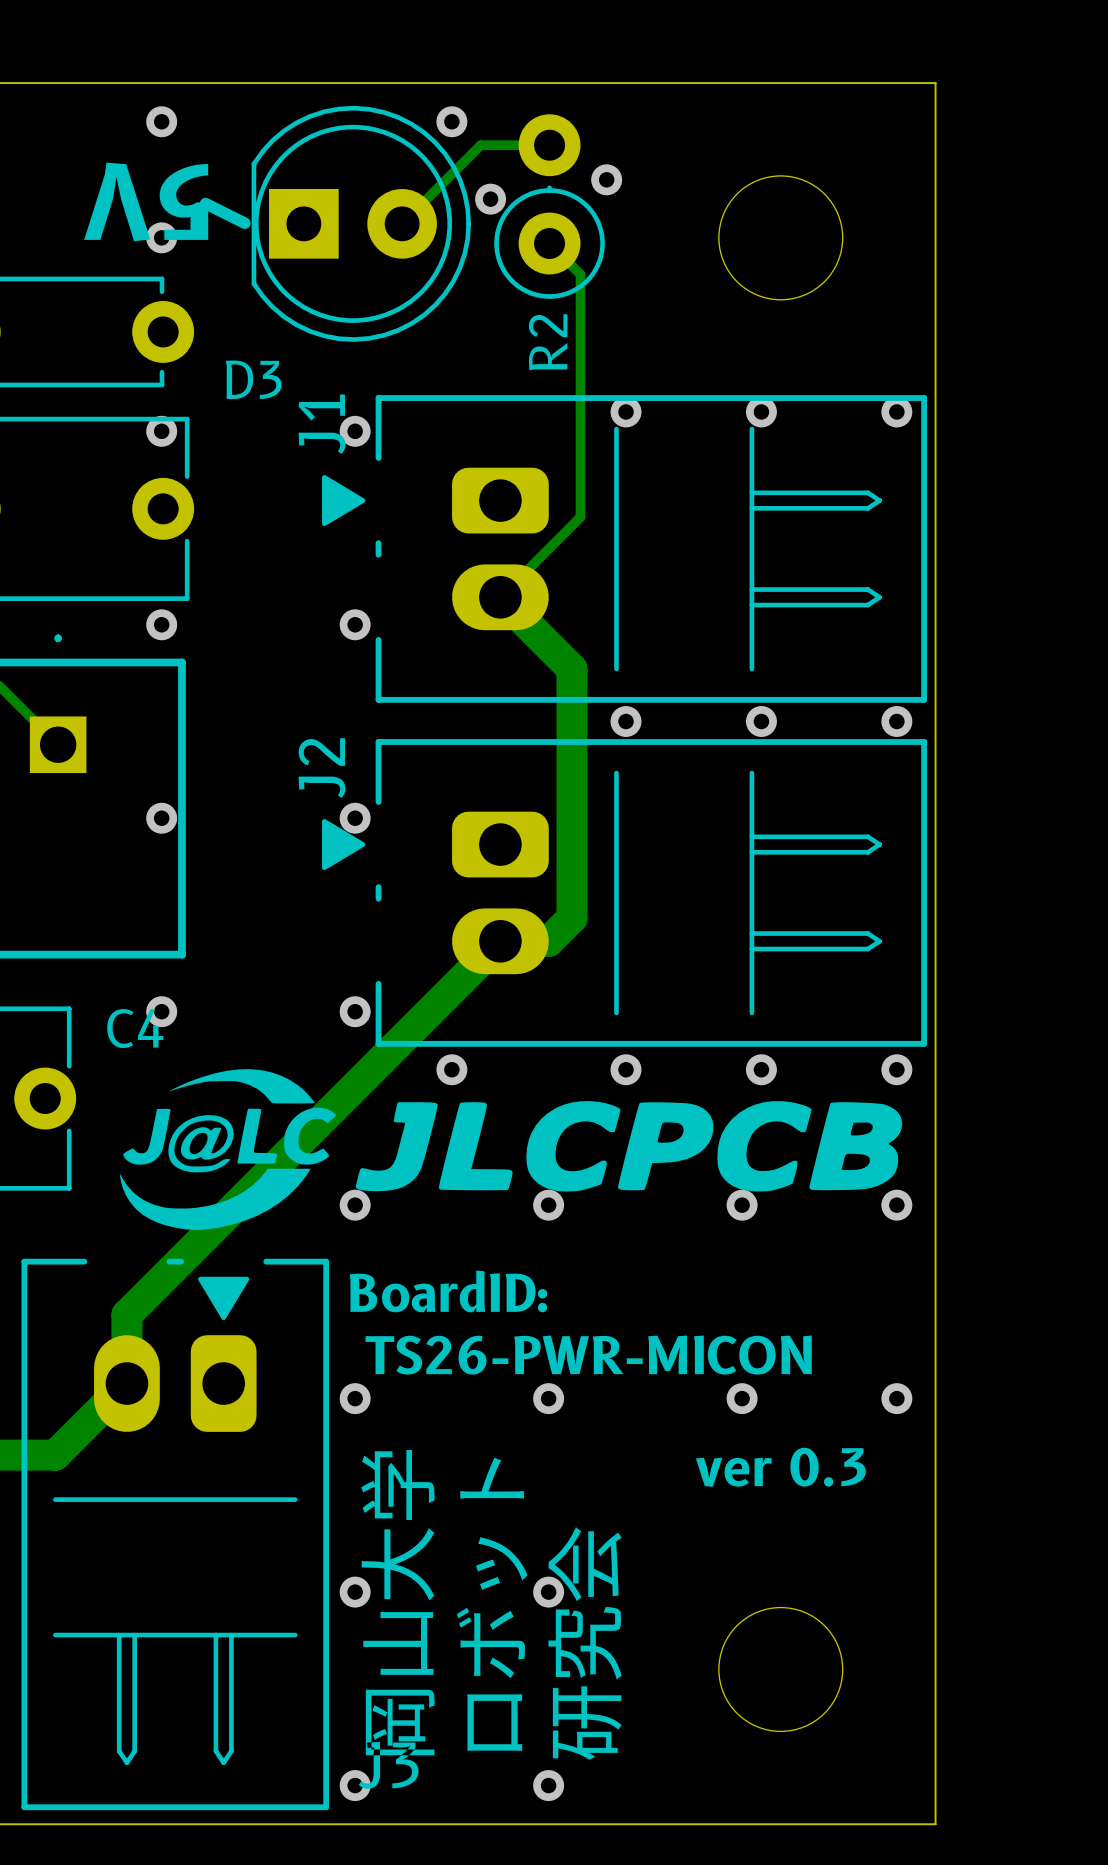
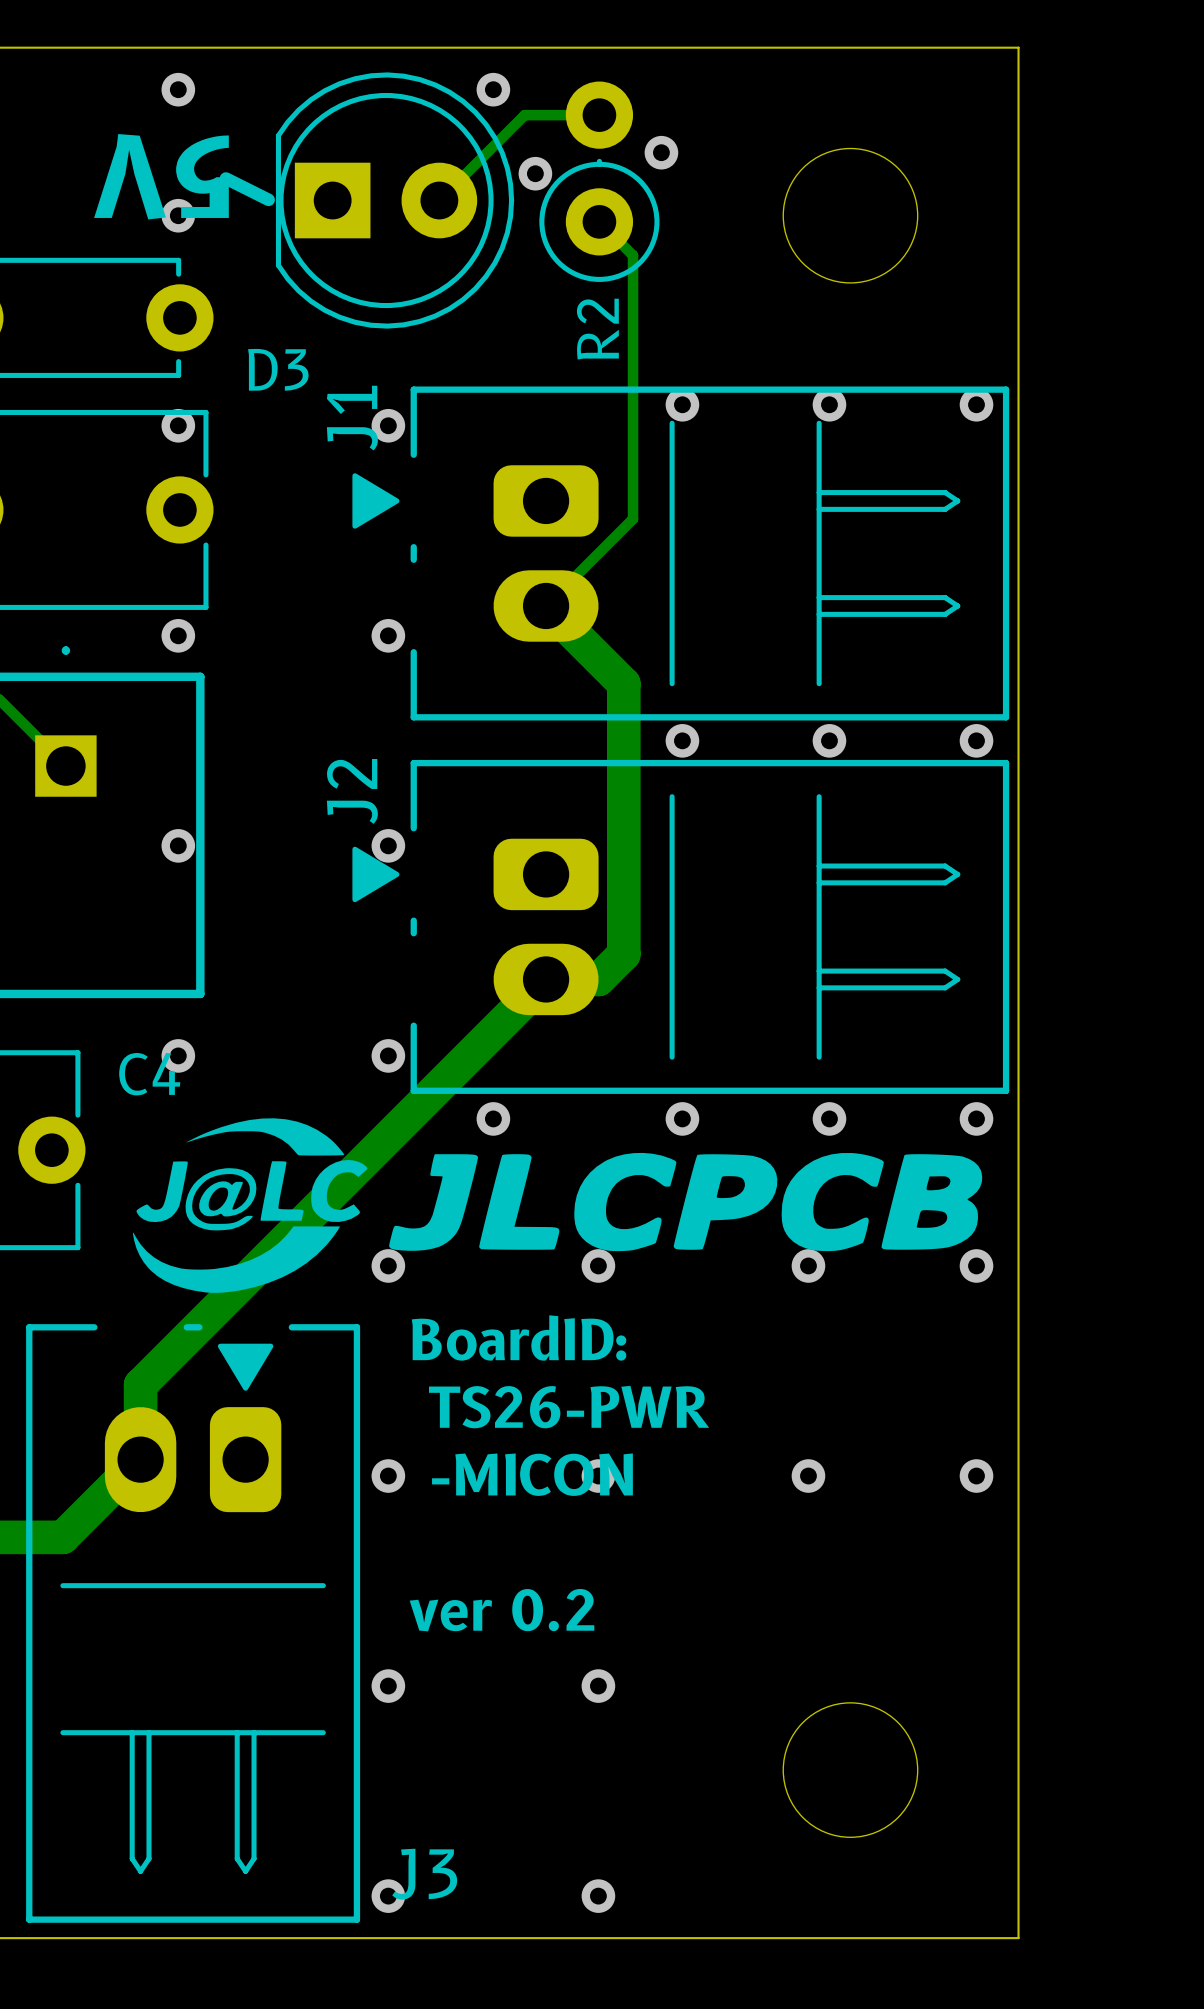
text position: BoardID: (448, 1291) -> BoardID: (519, 1337)
text: none -> TS26-PWR (569, 1407)
text: TS26-PWR-MICON (588, 1355) -> none
text: none -> -MICON (532, 1474)
text: ver 0.3 (780, 1467) -> none
text: none -> ver 0.2 (501, 1610)
text: 岡山大学 (397, 1602) -> none
text: ロボット (492, 1604) -> none
text: 研究会 (585, 1643) -> none

